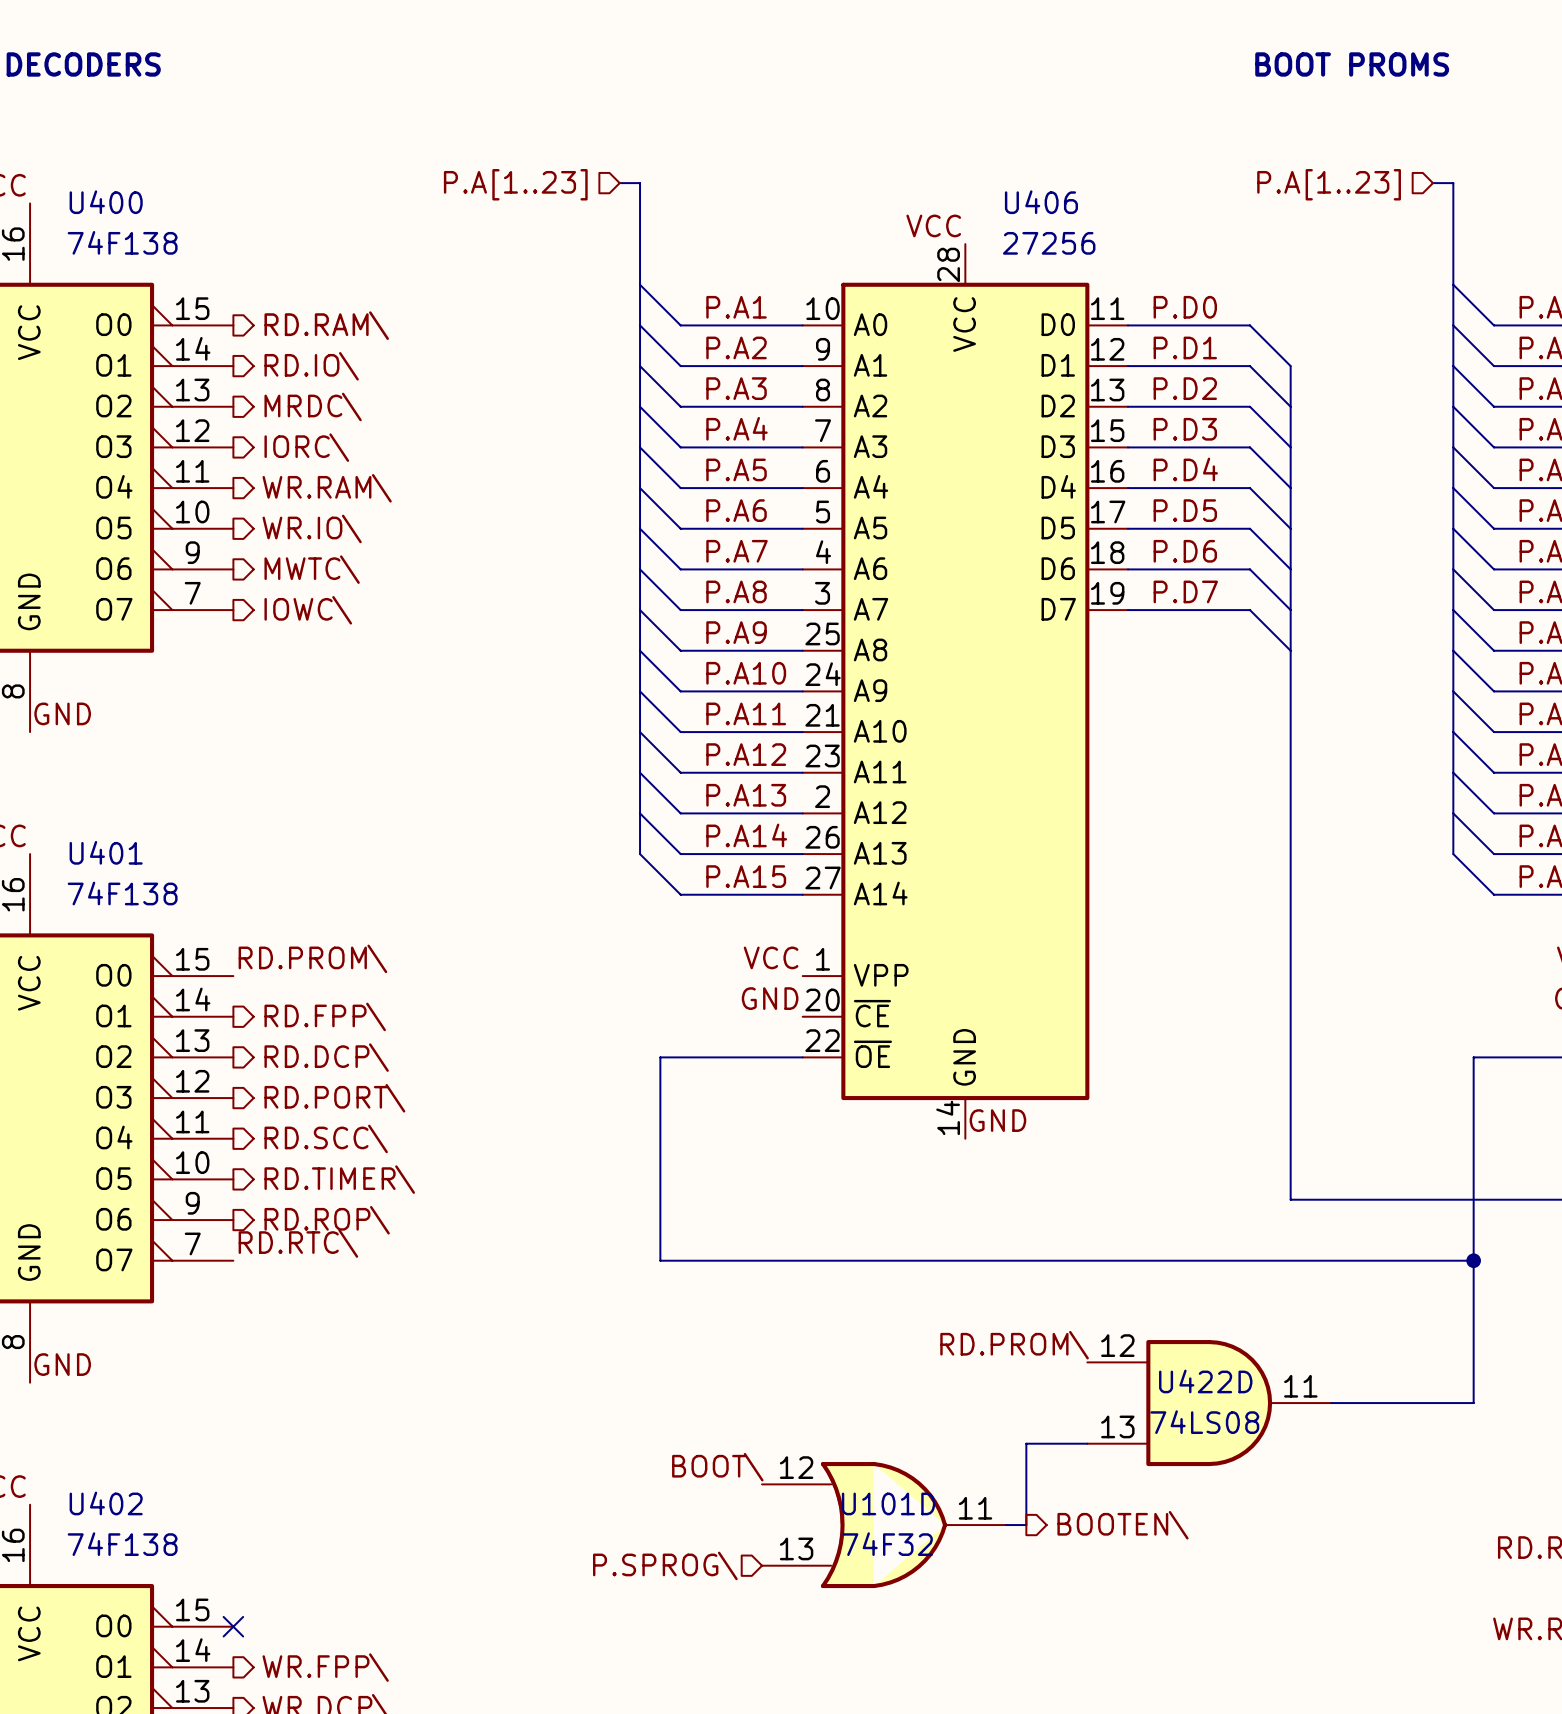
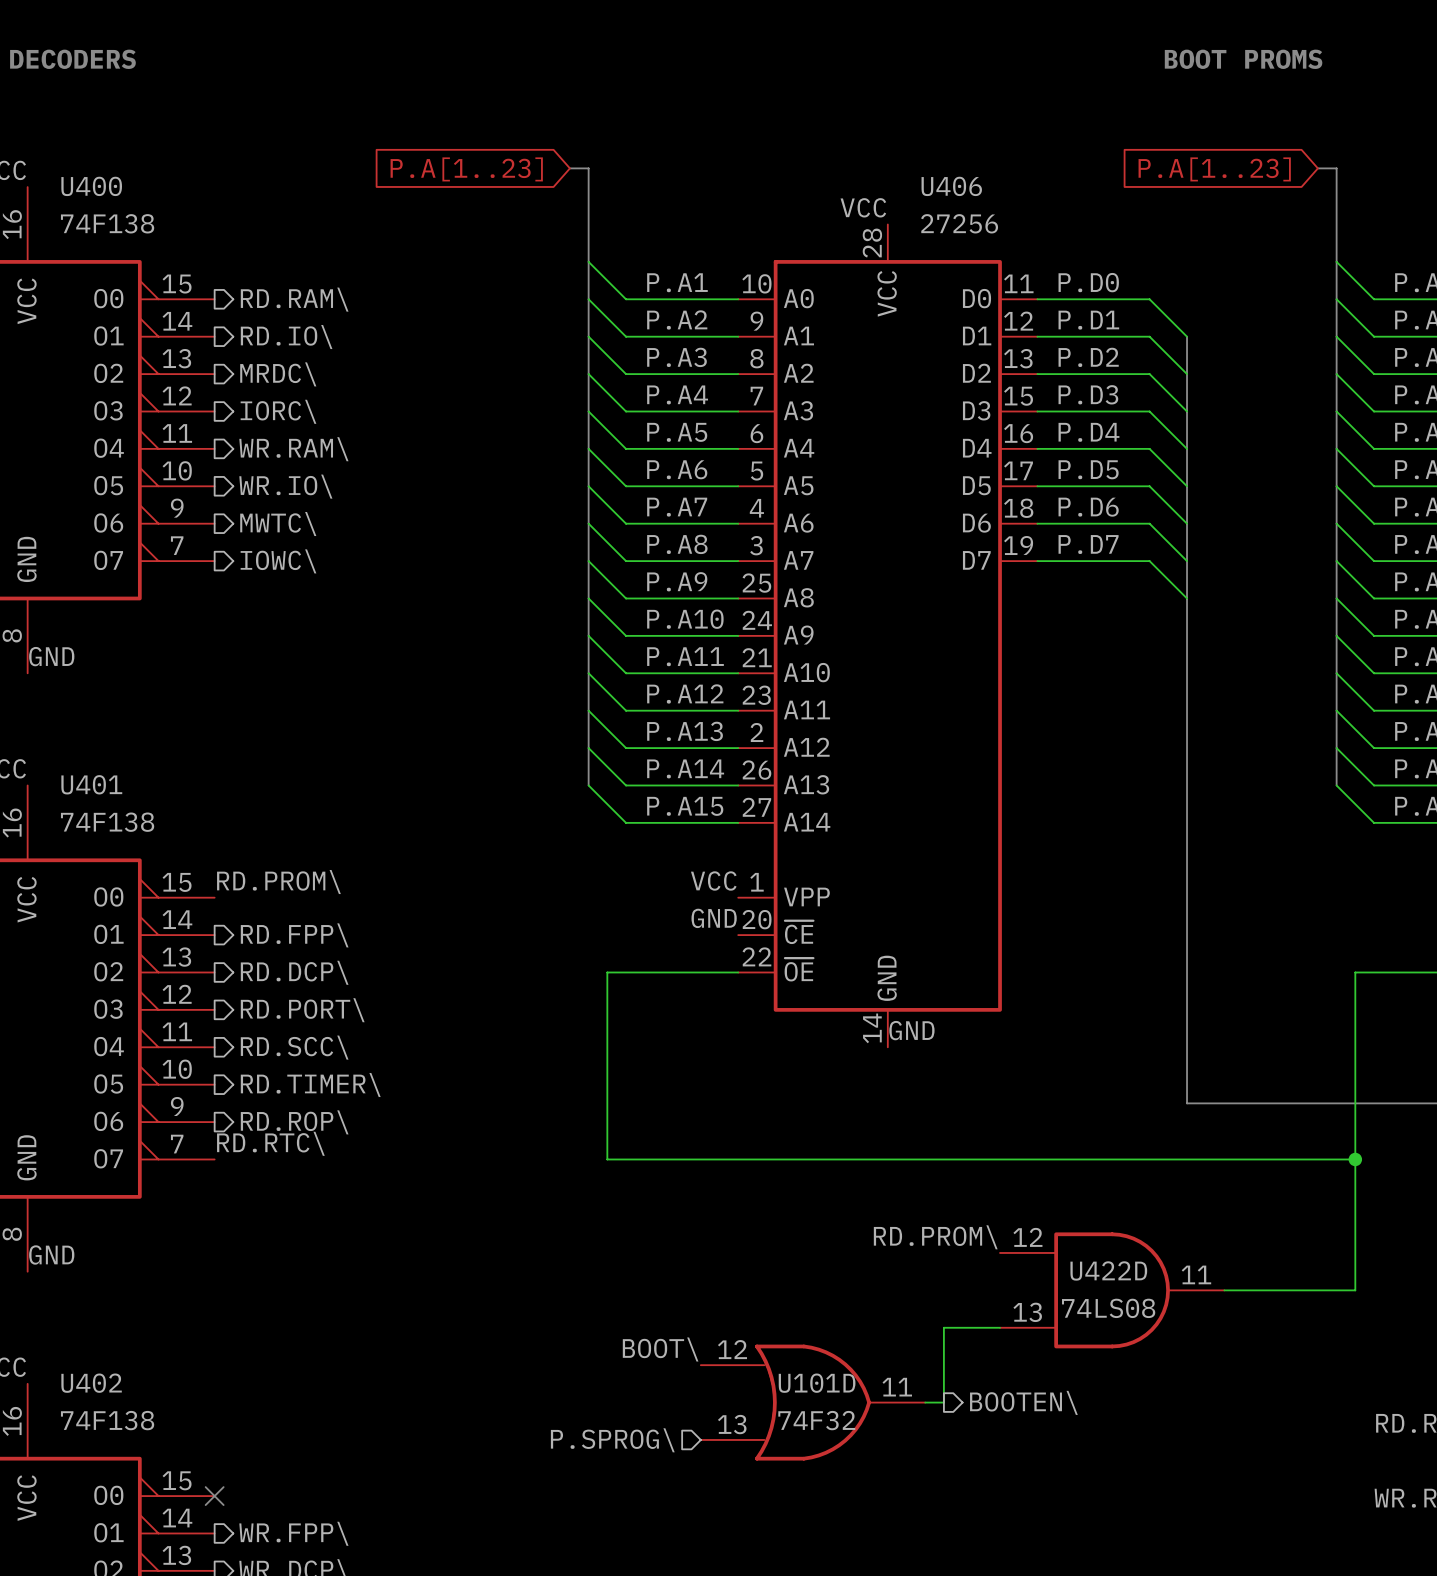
hierarchical label: P.A[1..23] (515, 184) -> none
hierarchical label: P.A[1..23] (1329, 184) -> none
global label: none -> P.A[1..23] (466, 169)
global label: none -> P.A[1..23] (1214, 169)

